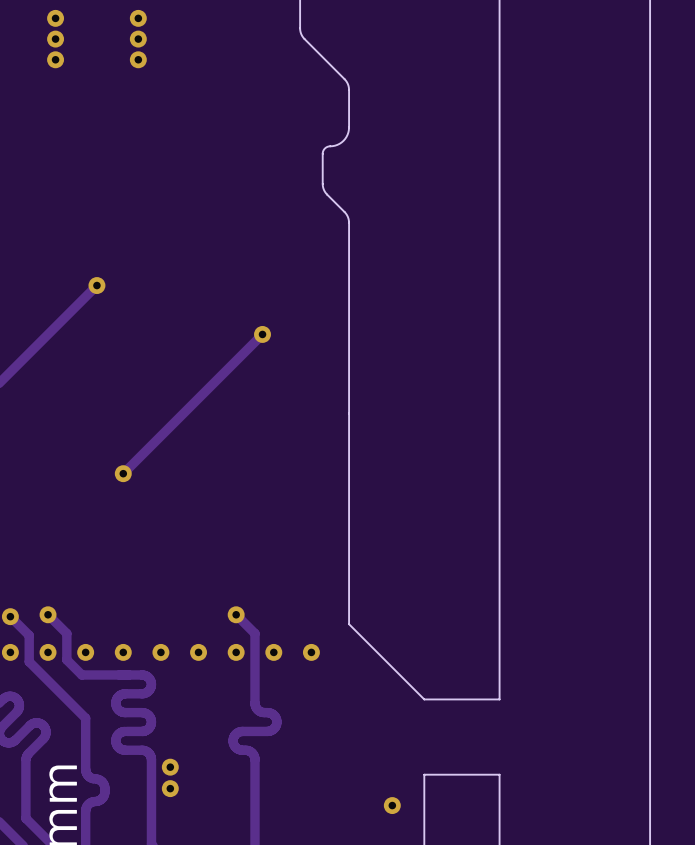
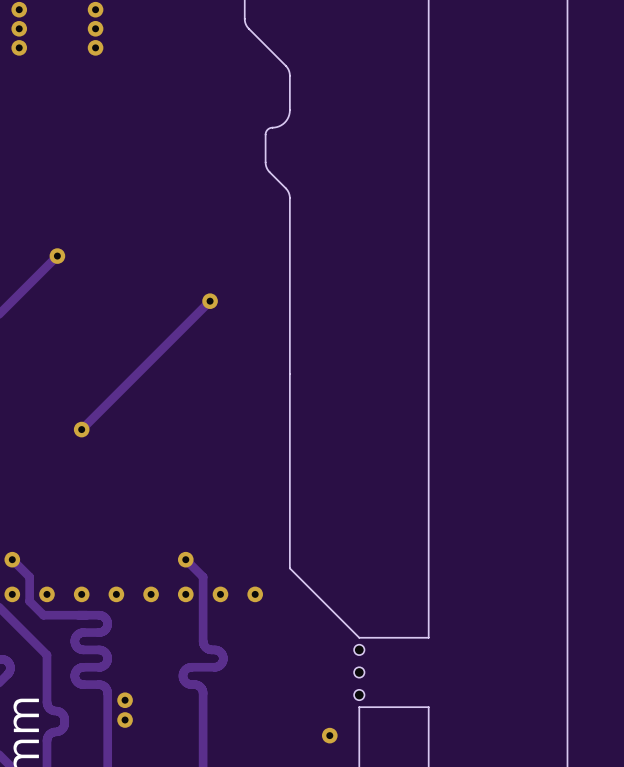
part: none -> (359, 649)
part: none -> (359, 672)
part: none -> (359, 695)

